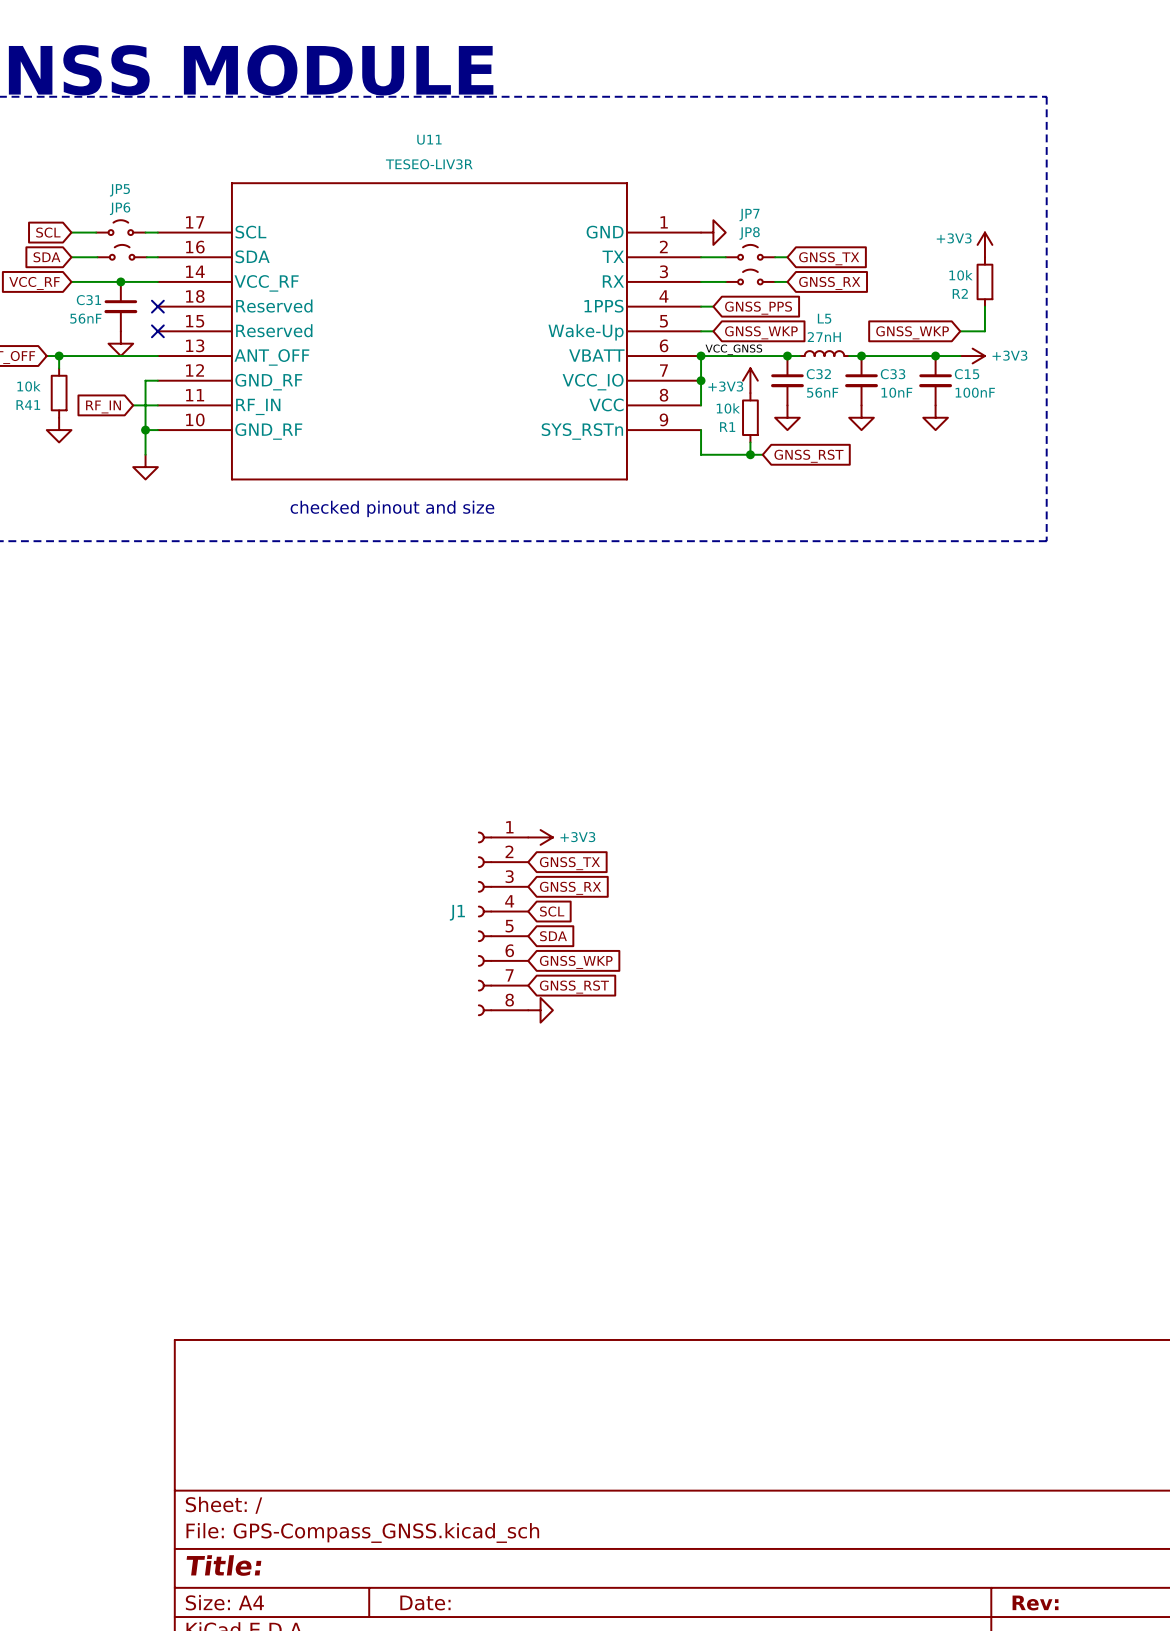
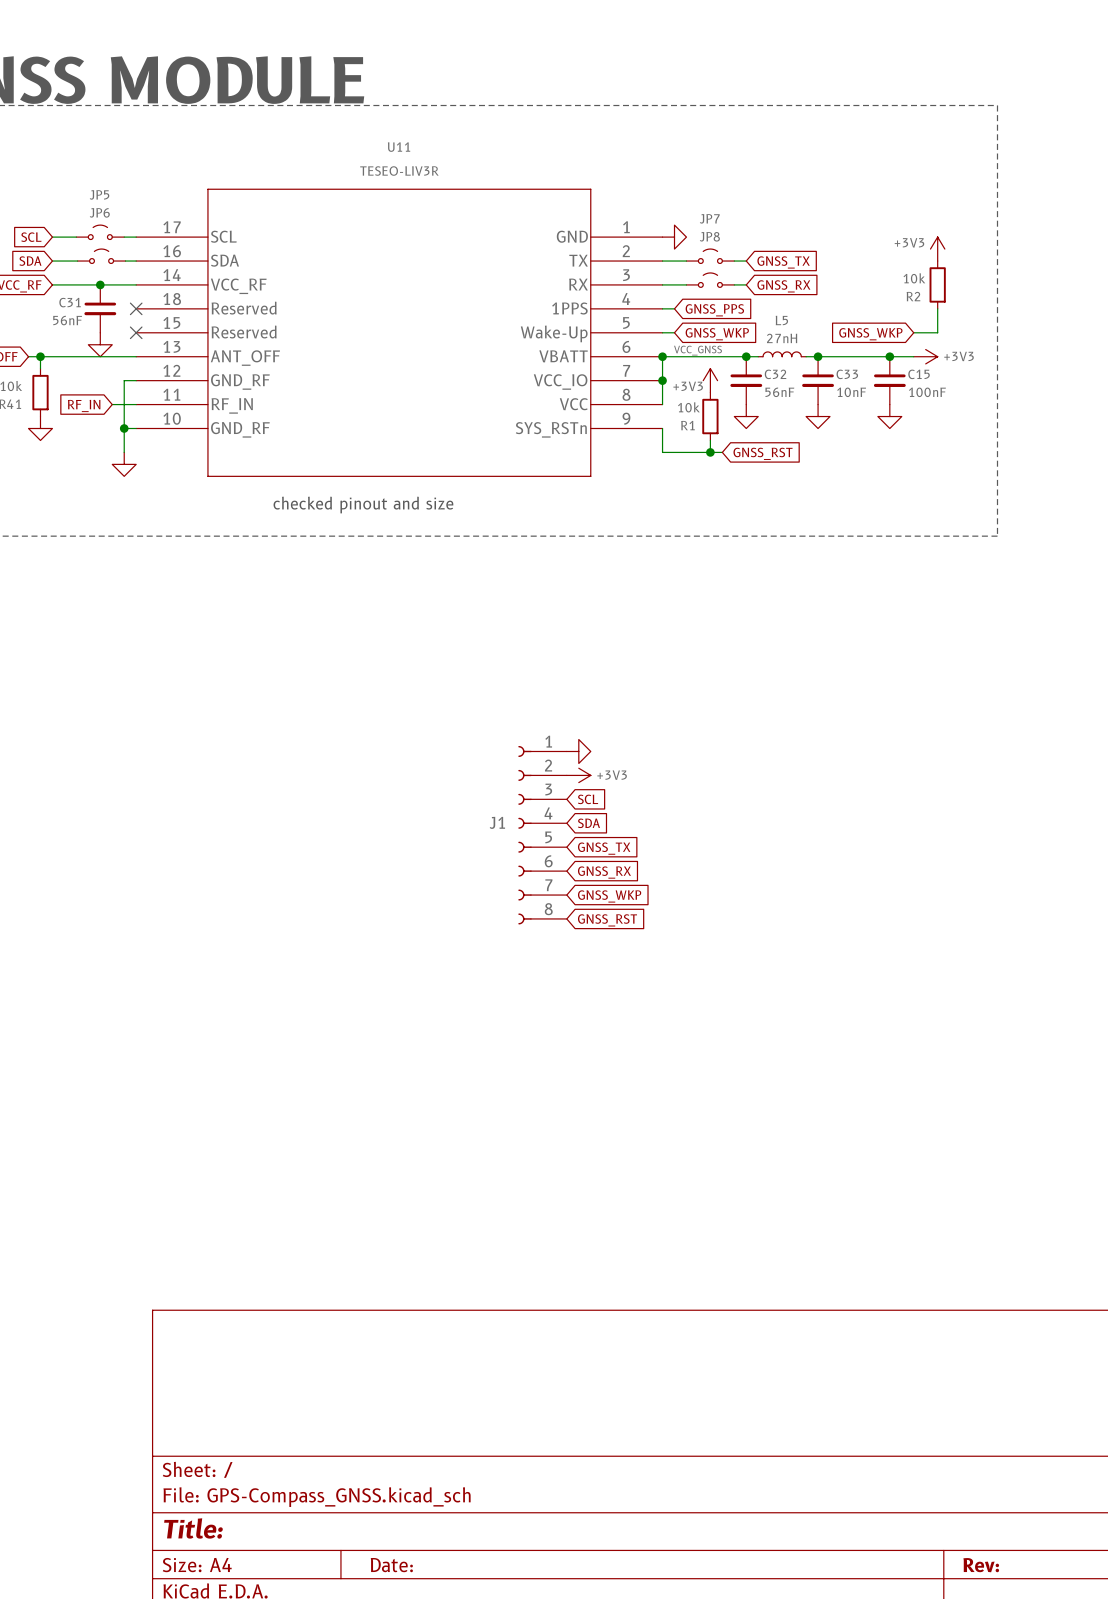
power symbol: none -> (578, 751)
power symbol position: +3V3 (540, 837) -> +3V3 (578, 775)
global label position: GNSS_TX (569, 863) -> GNSS_TX (604, 848)
global label position: GNSS_RX (570, 888) -> GNSS_RX (604, 872)
global label position: SCL (552, 911) -> SCL (588, 799)
J1 position: (503, 923) -> (542, 835)
global label position: SDA (553, 936) -> SDA (588, 823)
global label position: GNSS_WKP (576, 962) -> GNSS_WKP (609, 896)
global label position: GNSS_RST (574, 987) -> GNSS_RST (607, 920)
power symbol: (540, 1010) -> none

